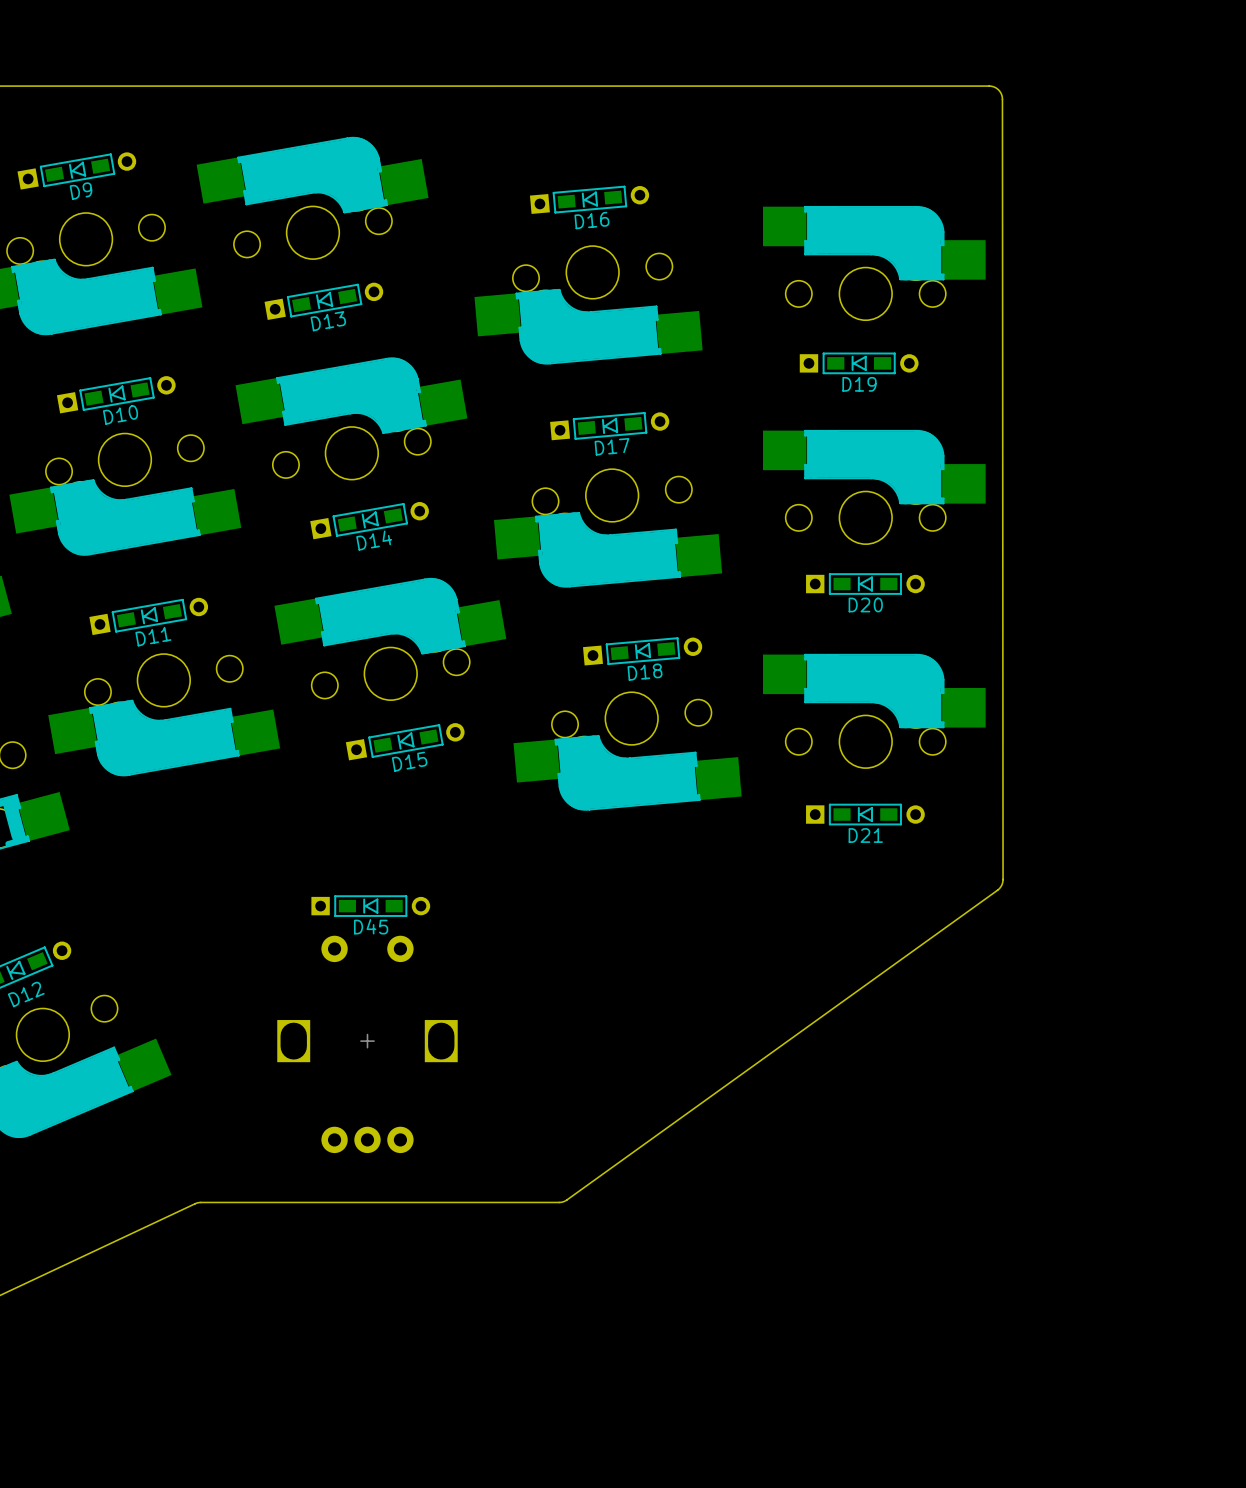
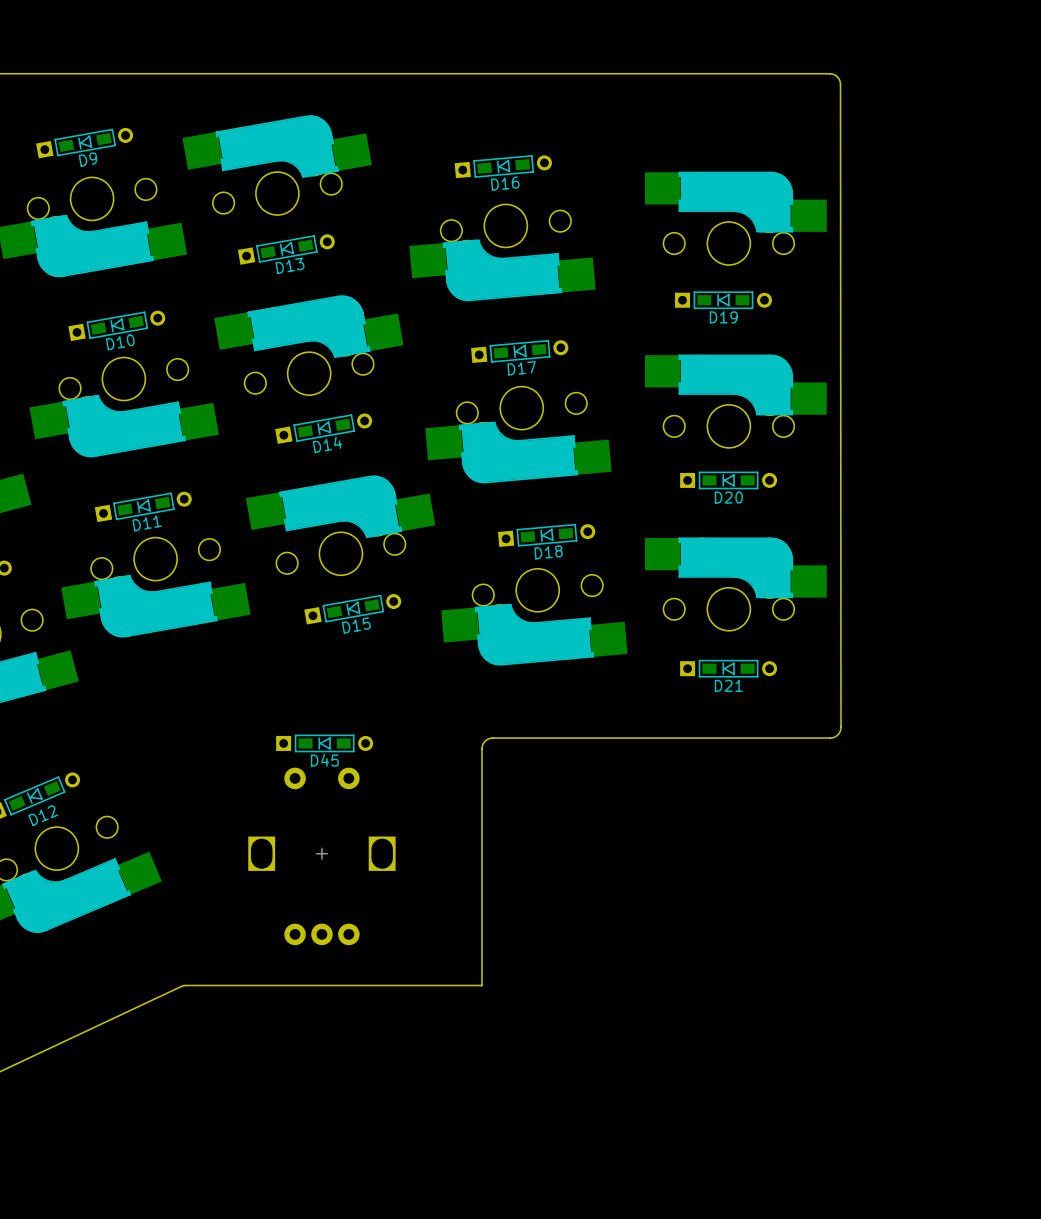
board edge: (1003, 879) (997, 890) (566, 1199) (559, 1202) -> (840, 721) (839, 733) (830, 738) (492, 738) (486, 740) (481, 748) (481, 985) (478, 985)

